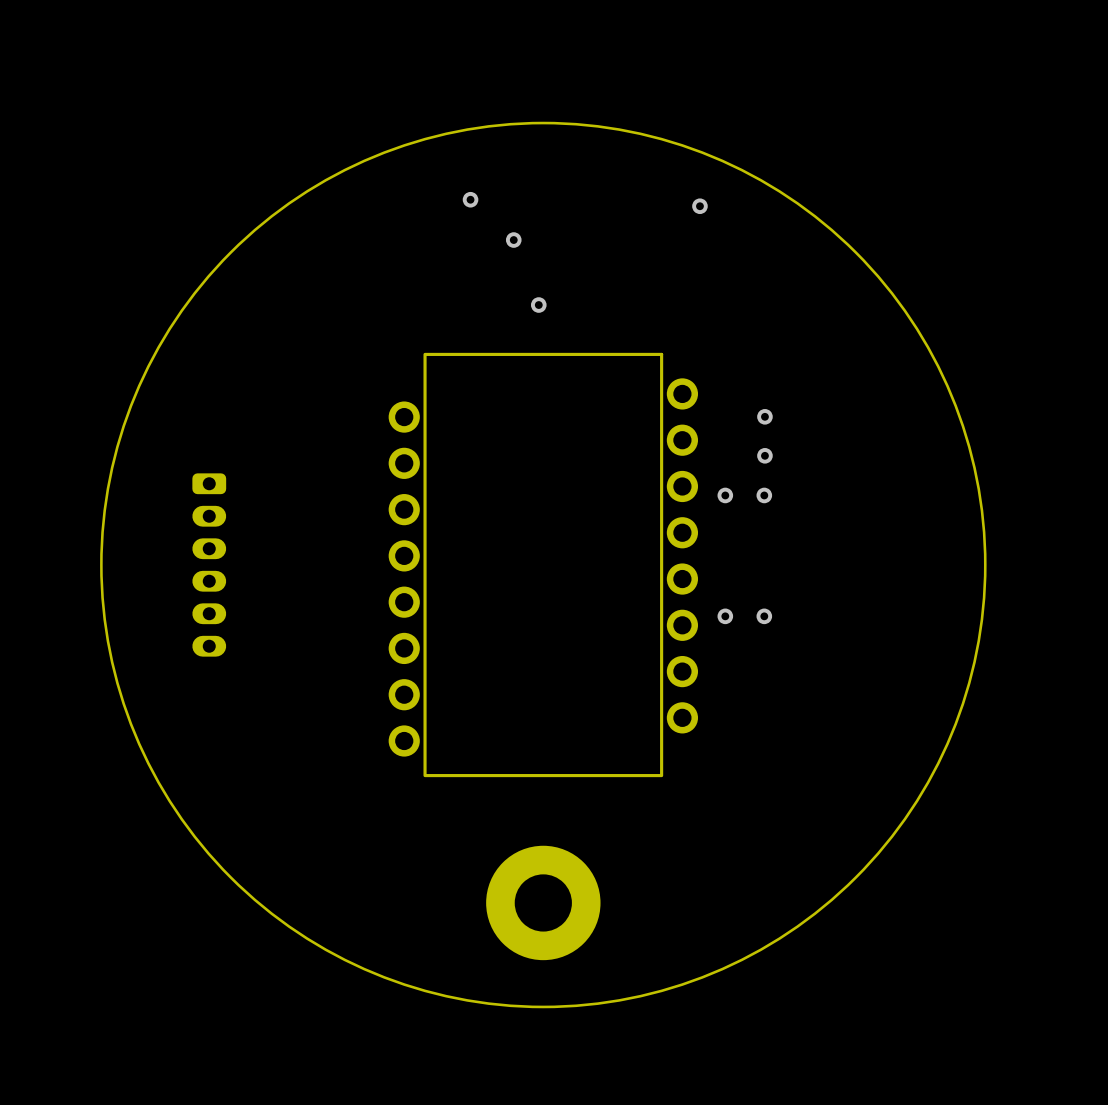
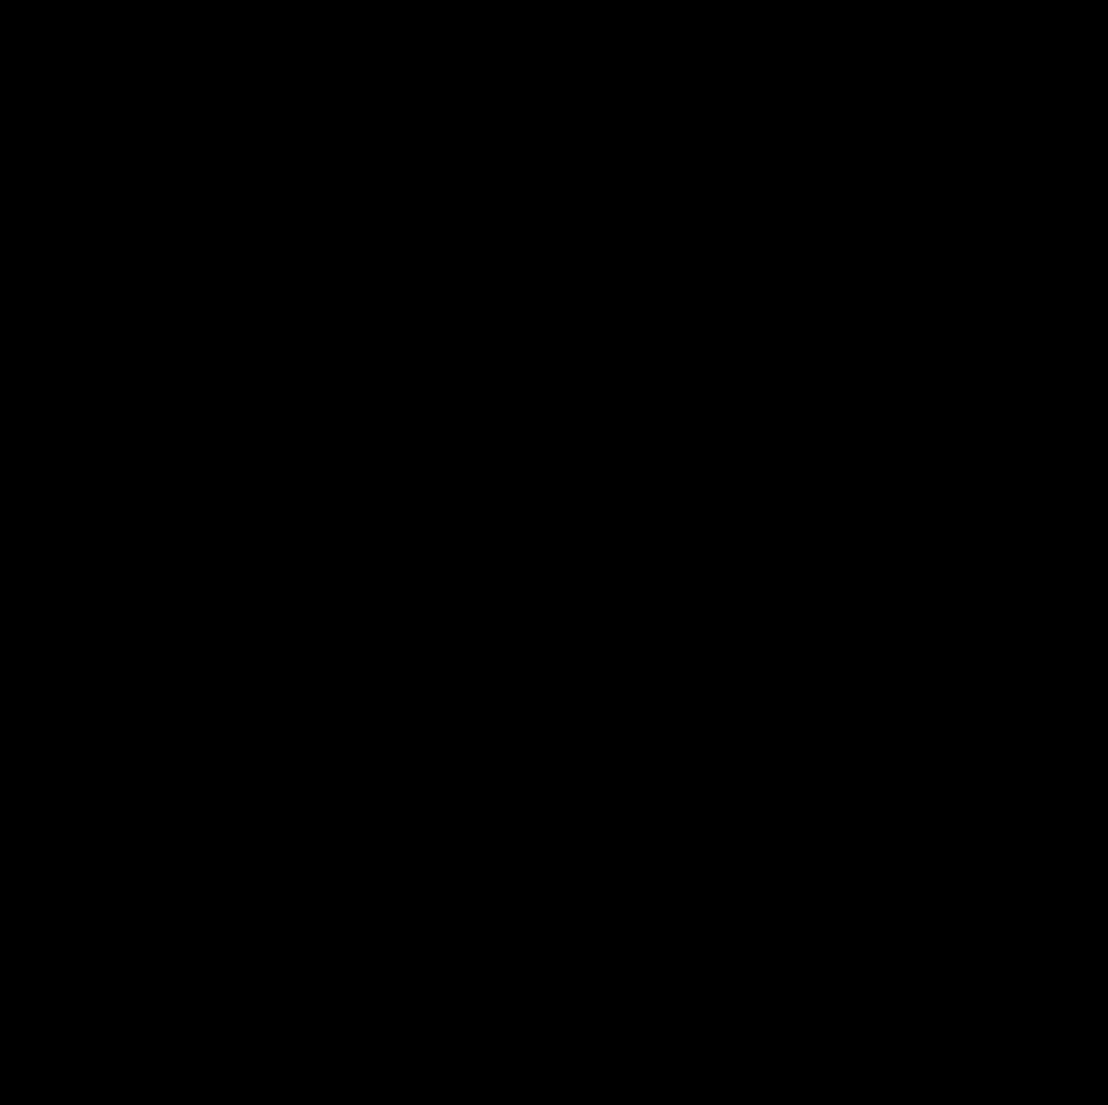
round board edge: [100, 121, 987, 1009] -> none
via: (470, 199) -> none
via: (699, 206) -> none
via: (513, 240) -> none
via: (538, 305) -> none
via: (764, 416) -> none
via: (764, 455) -> none
via: (725, 495) -> none
via: (764, 495) -> none
part: (209, 564) -> none
part: (543, 564) -> none
via: (725, 616) -> none
via: (764, 616) -> none
part: (543, 902) -> none

